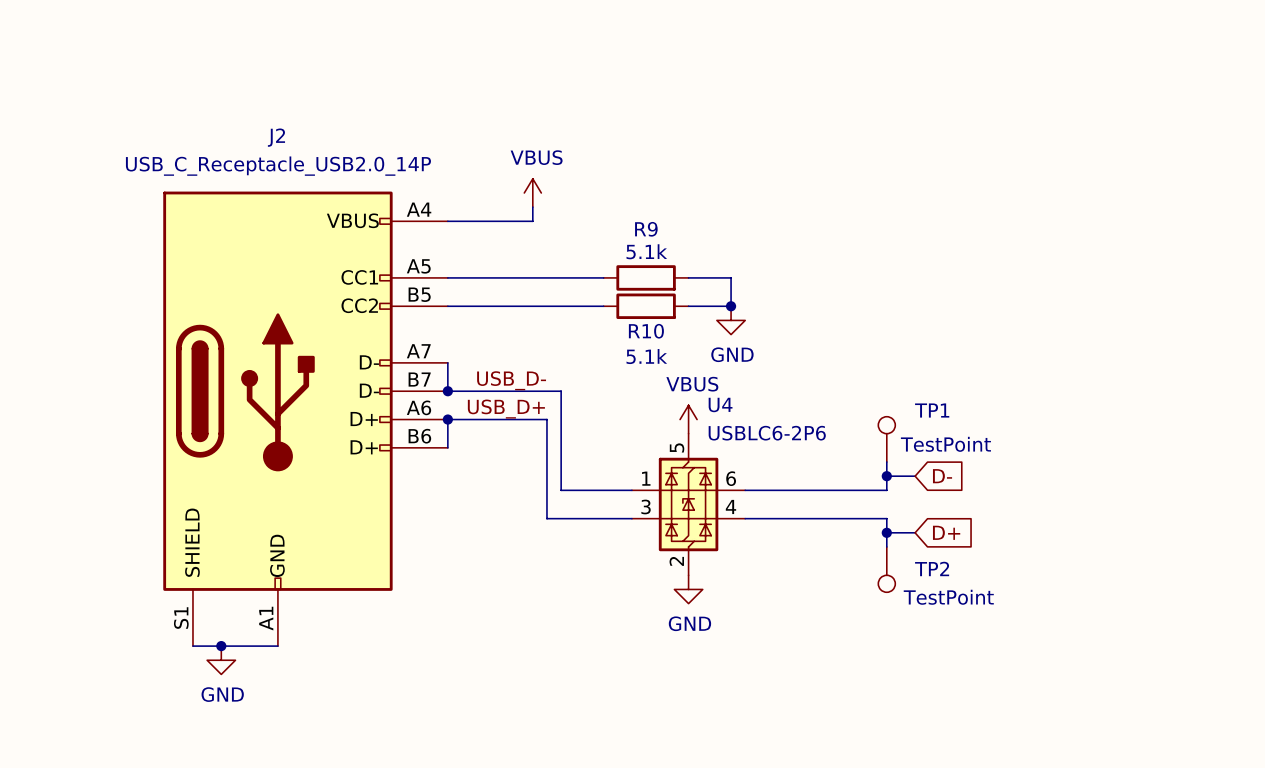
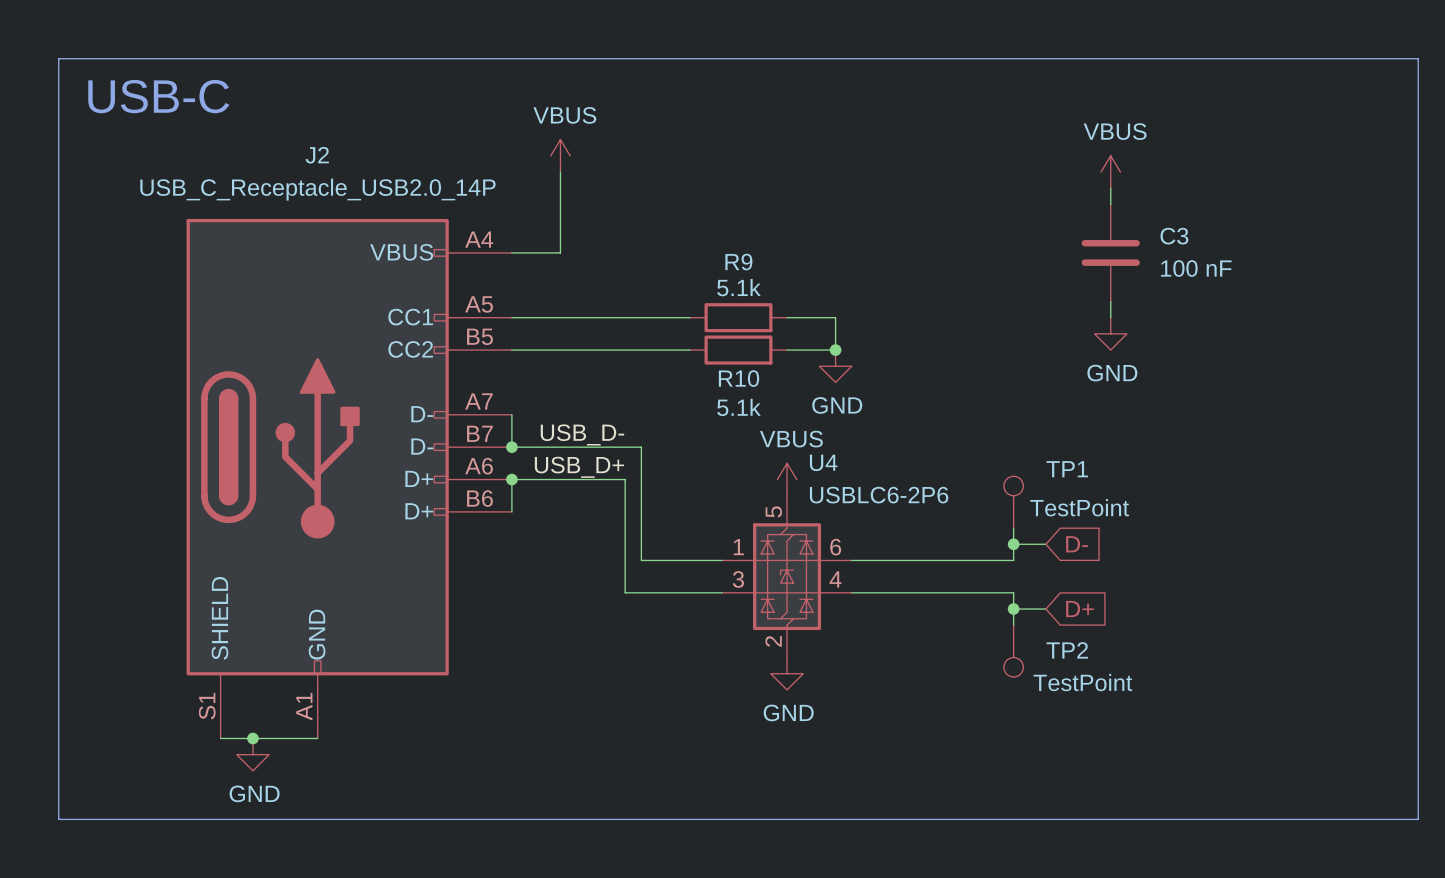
line: none -> (58, 58) (1418, 58) (1418, 819) (58, 819) (58, 58)
text: none -> USB-C (158, 96)
power symbol: none -> VBUS (1110, 172)
wire: none -> (1110, 188) (1110, 204)
power symbol position: VBUS (532, 192) -> VBUS (560, 155)
wire: (532, 207) (532, 221) (490, 221) -> (560, 172) (560, 252)
C3: none -> 100 nF (1110, 252)
wire: none -> (1110, 301) (1110, 317)
power symbol: none -> GND (1110, 333)

